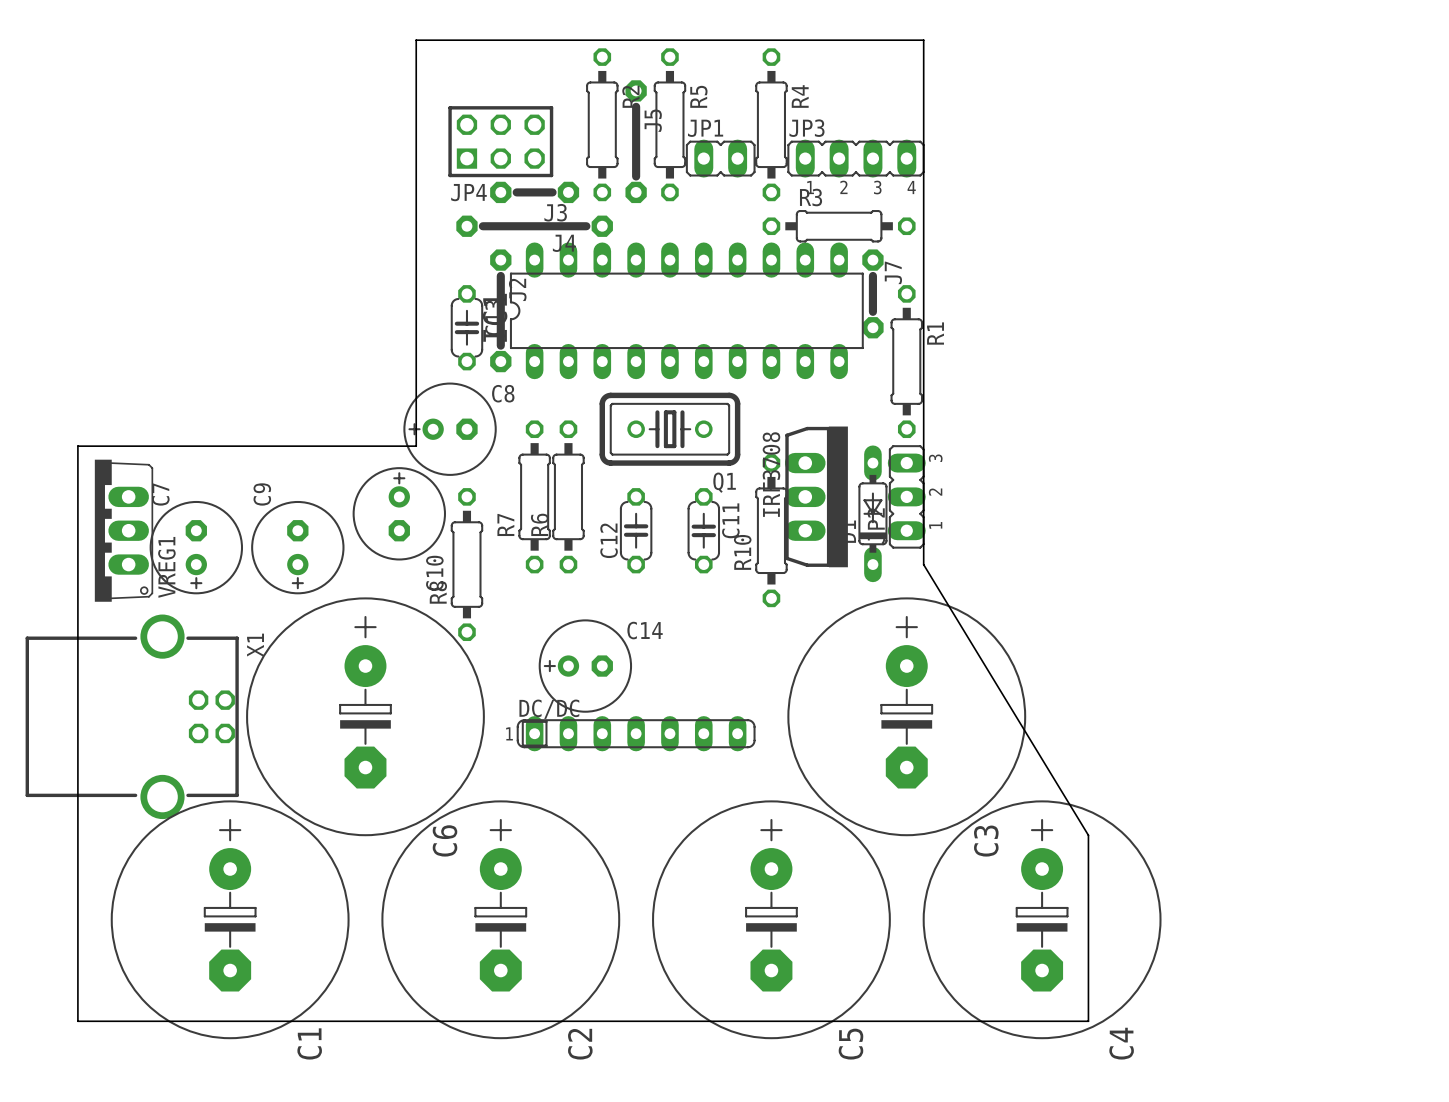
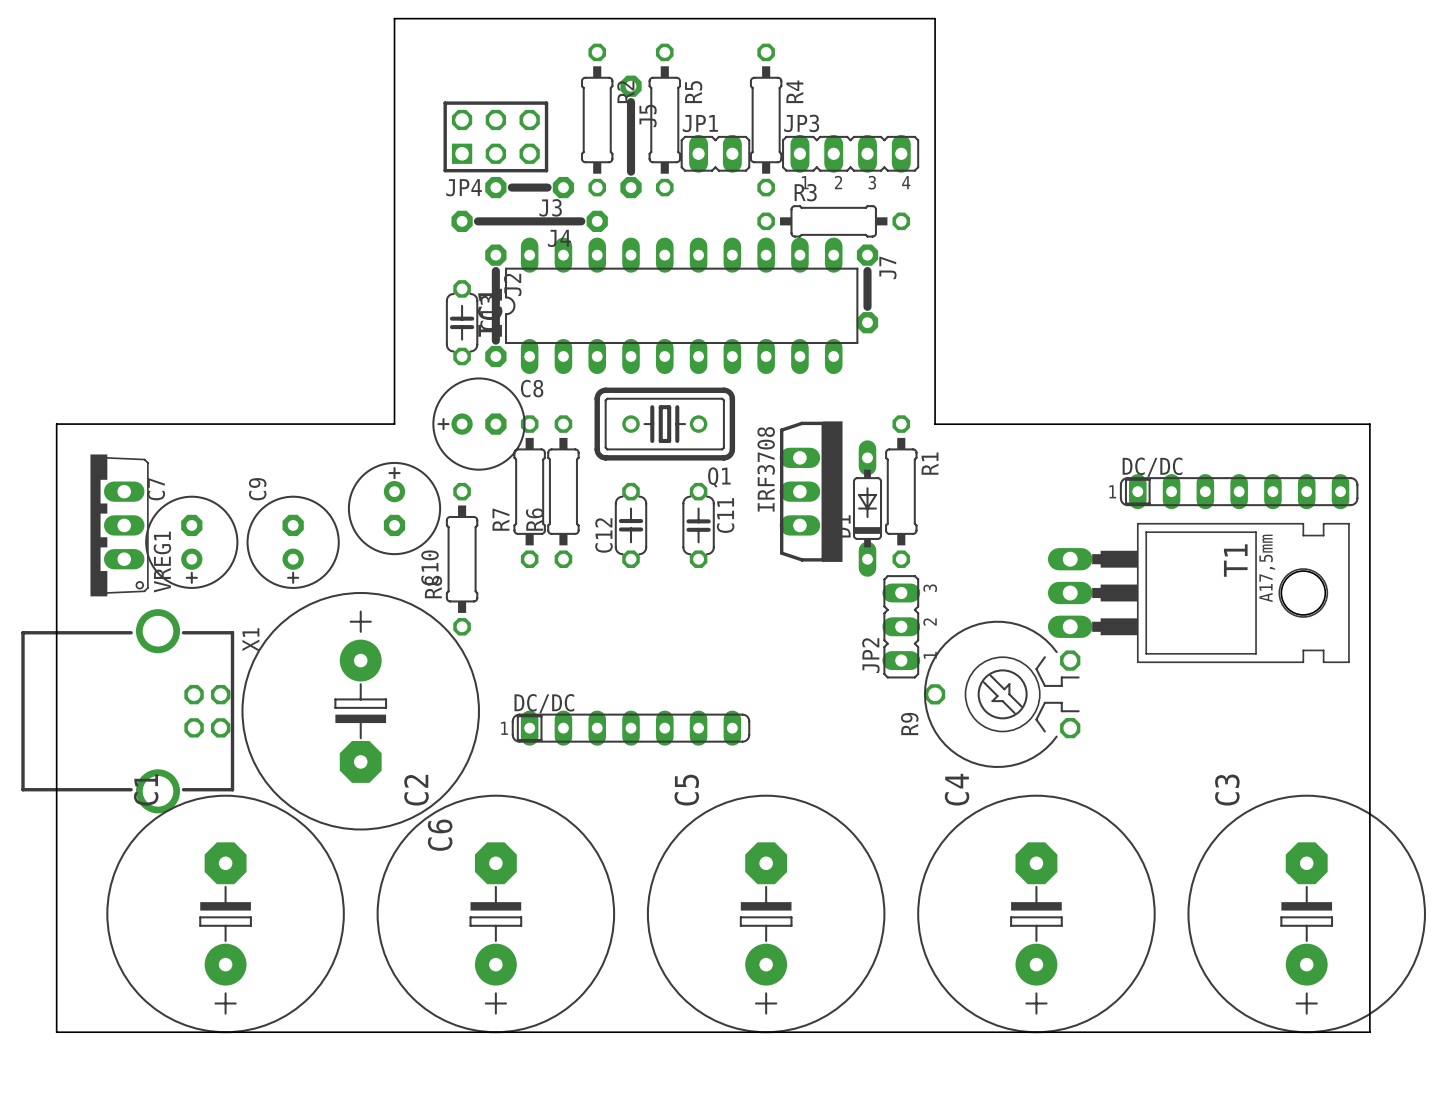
board edge: (416, 40) (923, 40) (923, 564) (1088, 835) (1088, 1021) (77, 1021) (77, 446) (416, 446) (416, 40) -> (394, 18) (394, 424) (56, 424) (56, 1032) (1369, 1032) (1369, 424) (935, 424) (935, 18) (394, 18)
R1 position: (906, 361) -> (901, 491)
C8 position: (450, 429) -> (478, 424)
JP2 position: (906, 496) -> (901, 626)
DC/DC: none -> (1239, 491)
R10: (771, 530) -> none
T1: none -> (1198, 593)
C14: (585, 666) -> none
R9: none -> (1002, 694)
C3 rotation: 0° (906, 716) -> 180° (1306, 913)
C3 position: (906, 716) -> (1306, 913)
C1 rotation: 0° (230, 919) -> 180° (225, 913)
C2 rotation: 0° (500, 919) -> 180° (495, 913)
C5 rotation: 0° (771, 919) -> 180° (766, 913)
C4 rotation: 0° (1042, 919) -> 180° (1036, 913)

